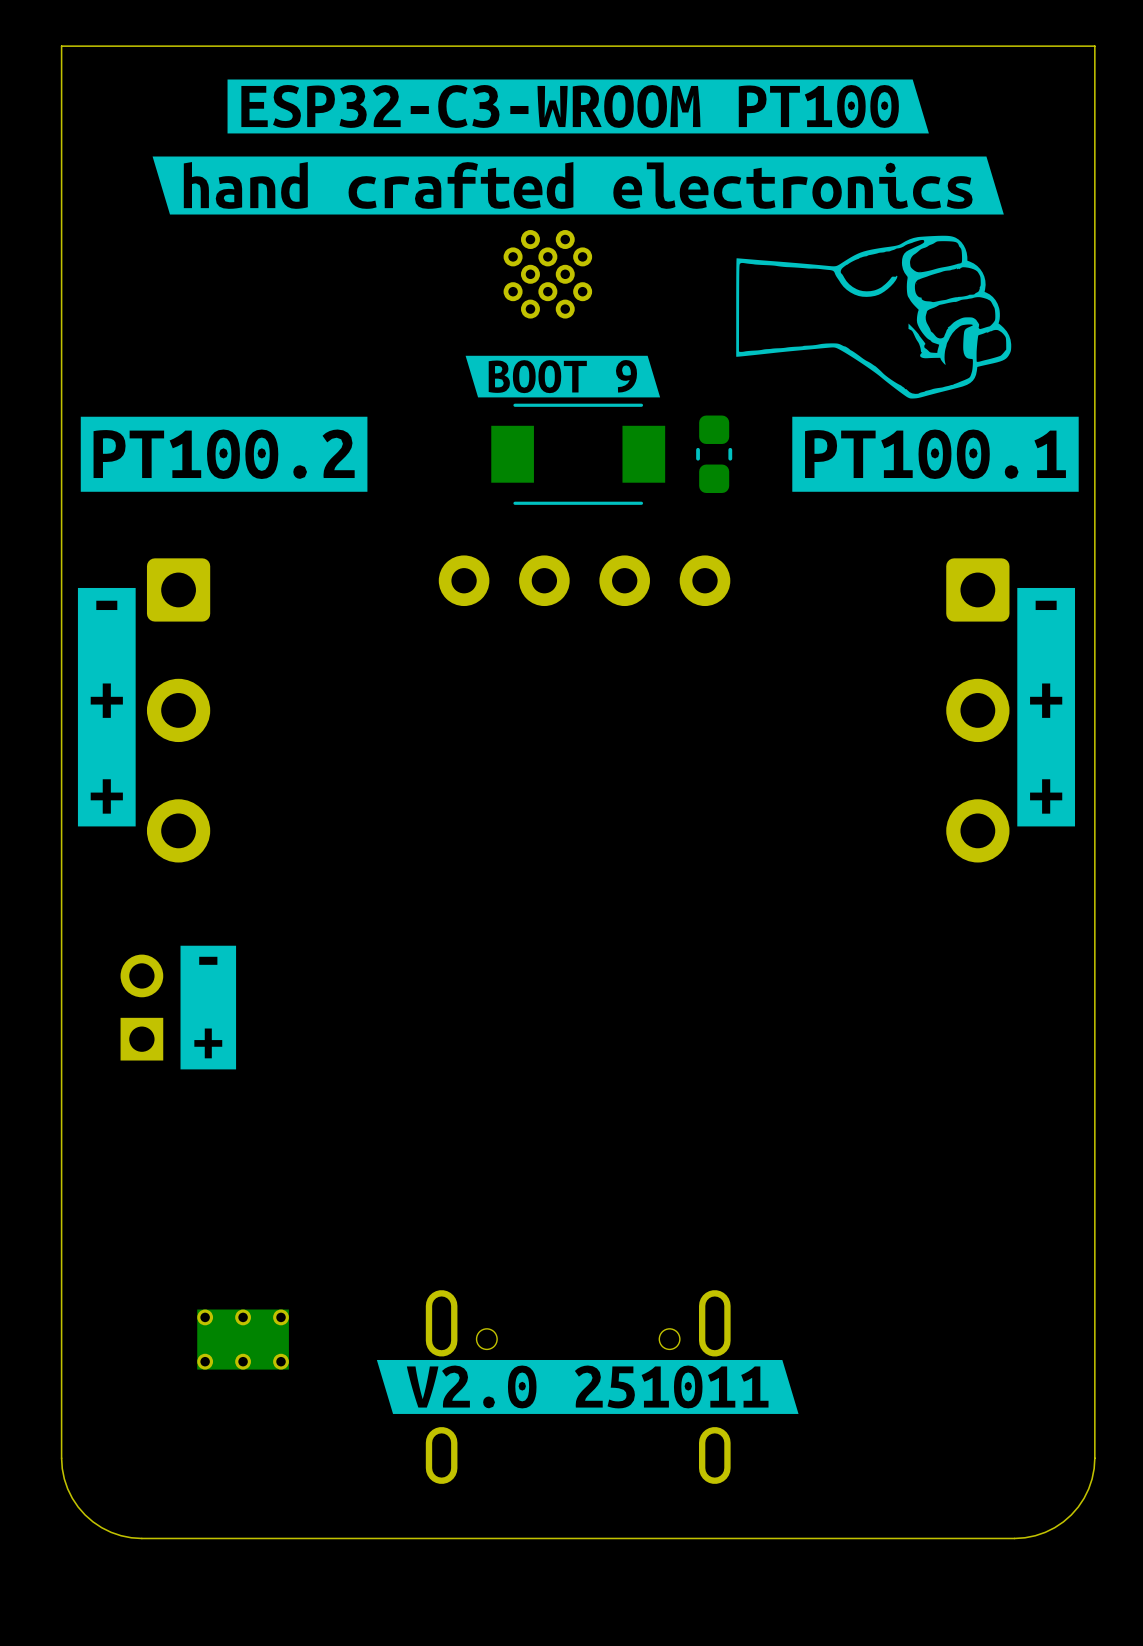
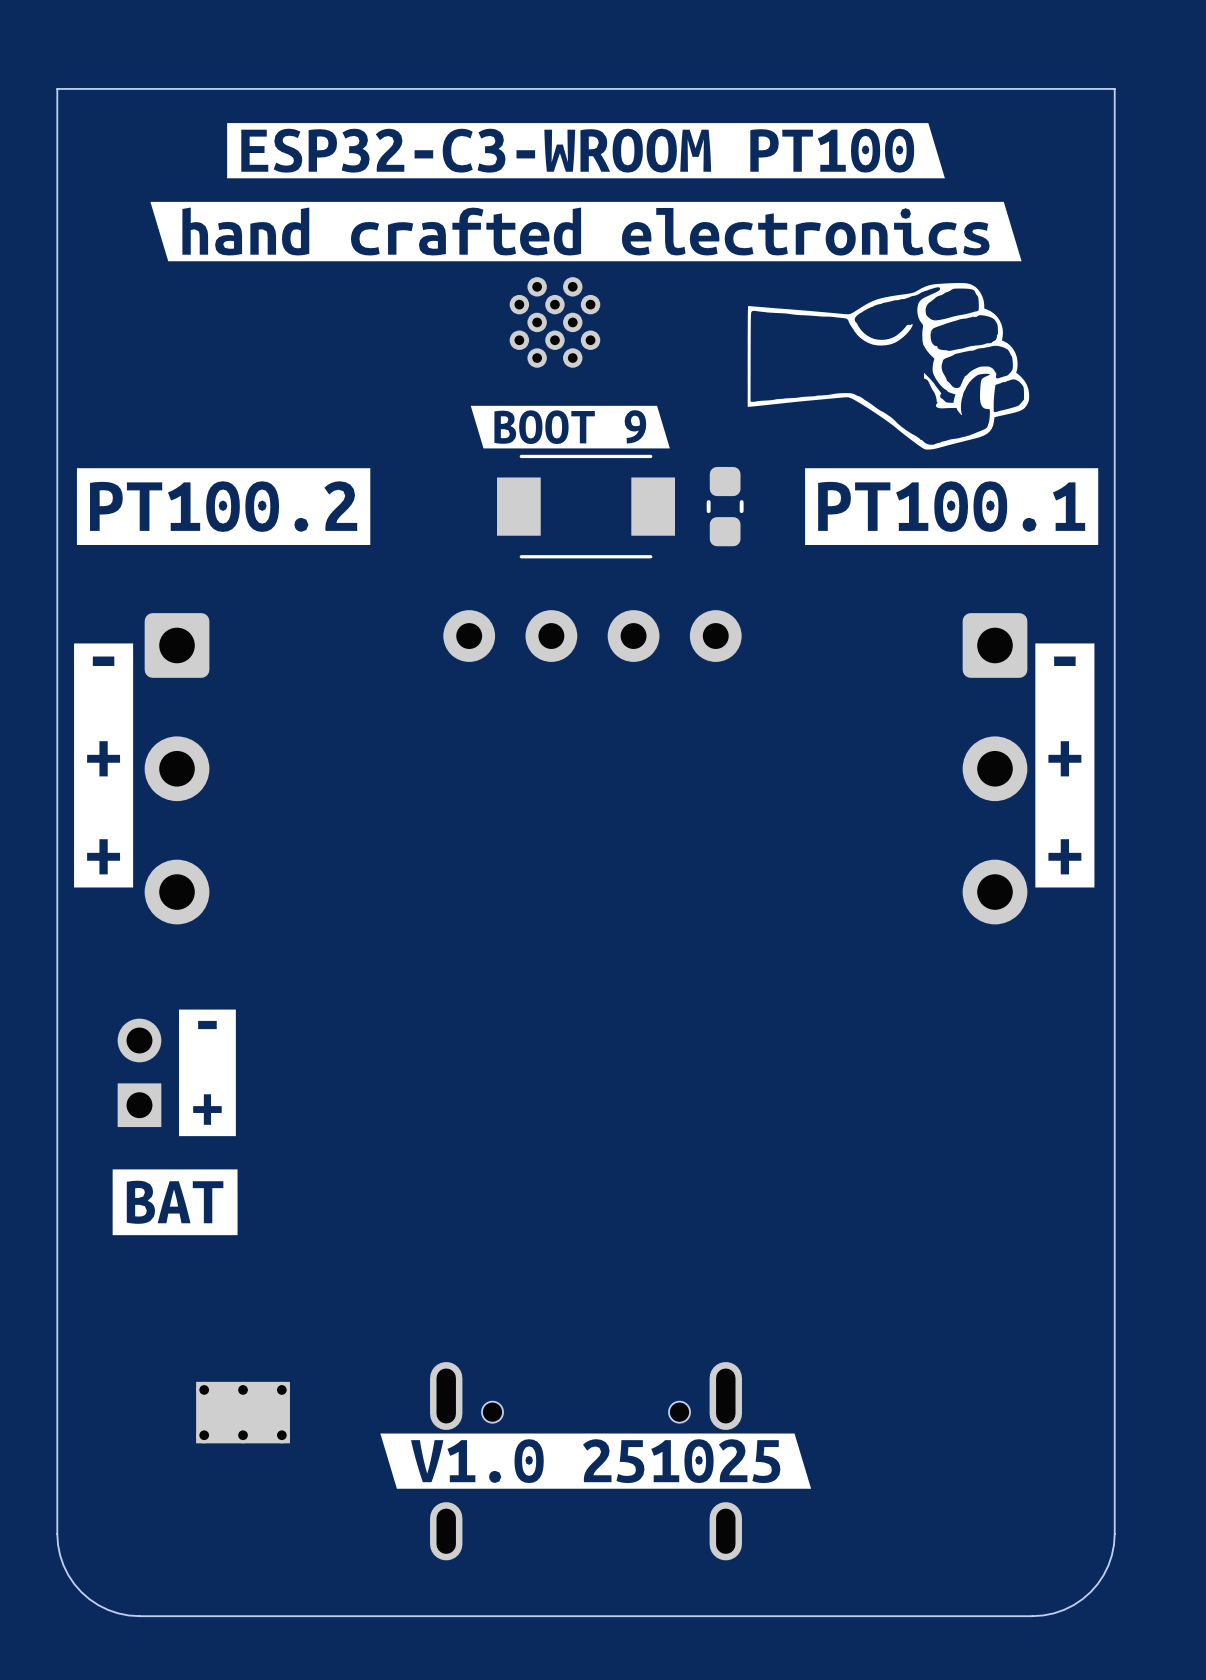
drawing: none -> [112, 1169, 238, 1236]
drawing shape: [376, 1359, 799, 1414] -> [380, 1433, 812, 1489]

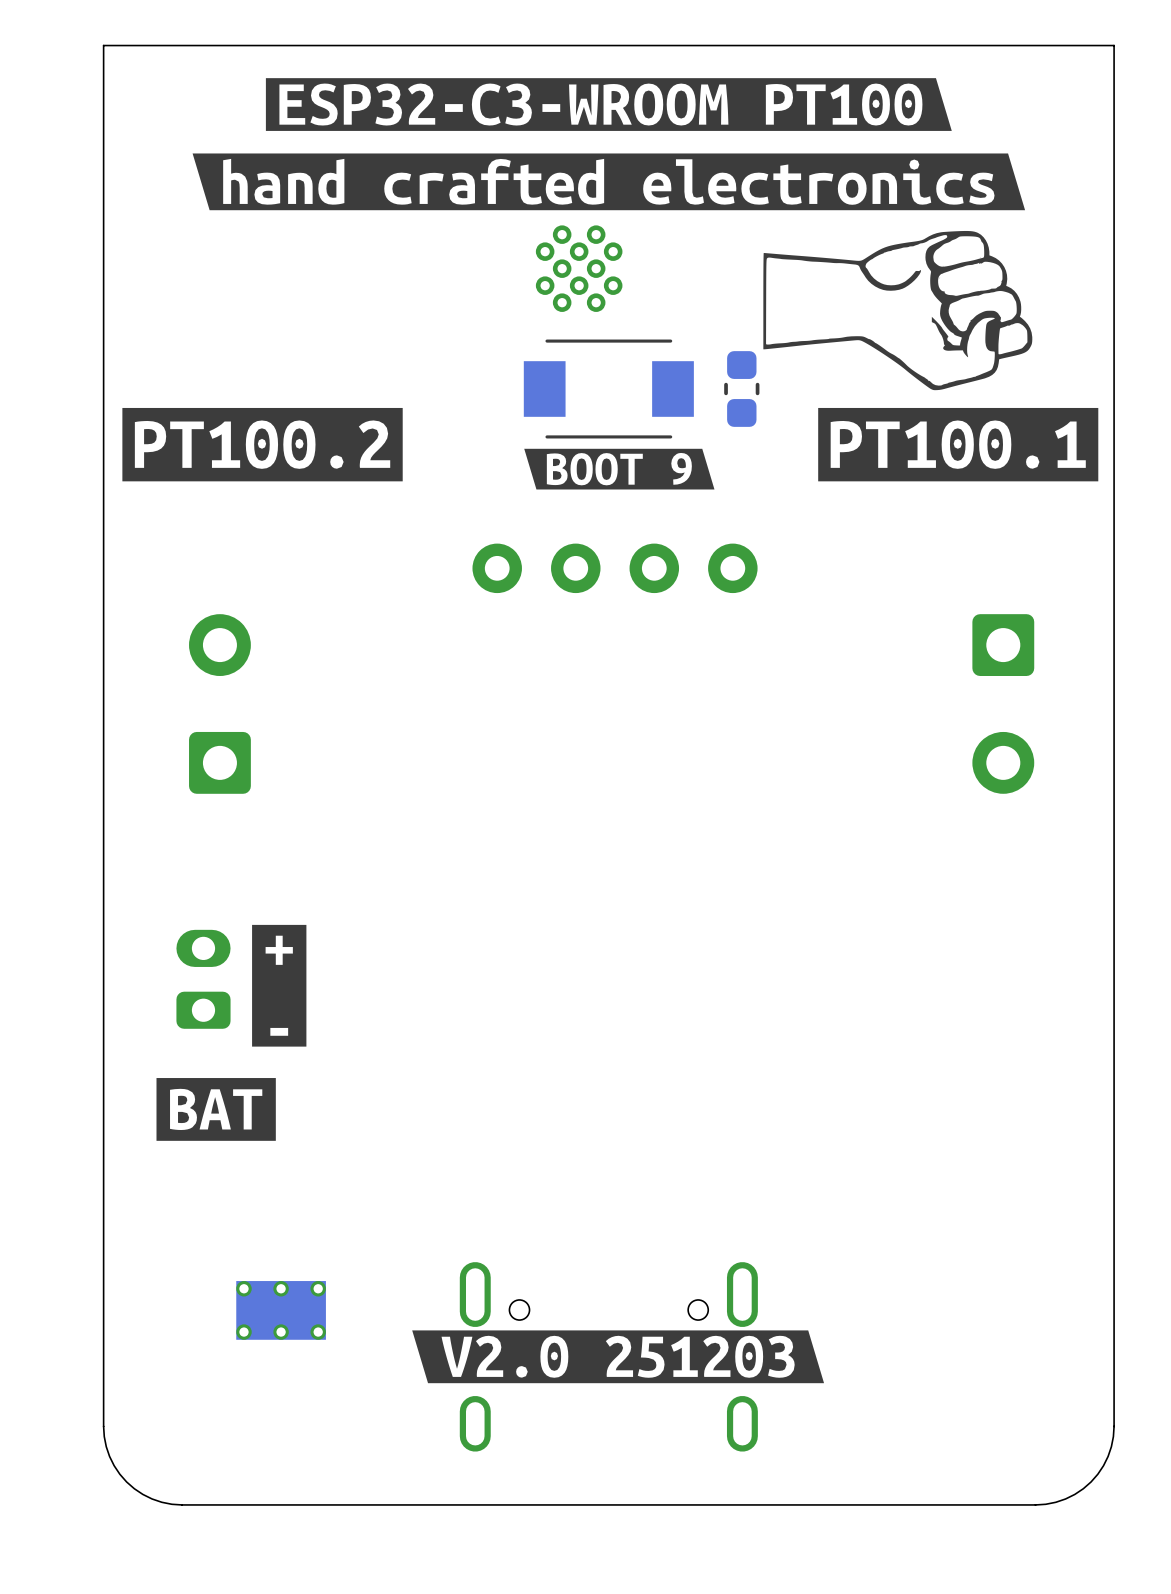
drawing position: (570, 427) -> (619, 469)
part position: (586, 506) -> (608, 389)
part position: (725, 506) -> (741, 389)
part footprint: [144, 613, 210, 925] -> [189, 614, 251, 794]
part footprint: [962, 613, 1028, 925] -> [972, 614, 1035, 794]
drawing: [74, 643, 134, 888] -> none
drawing: [1035, 643, 1095, 888] -> none
drawing: [179, 1009, 236, 1137] -> none
drawing: none -> [252, 924, 307, 1047]
part footprint: [117, 1018, 162, 1128] -> [176, 929, 231, 1029]
drawing shape: [380, 1433, 812, 1489] -> [412, 1330, 825, 1384]

